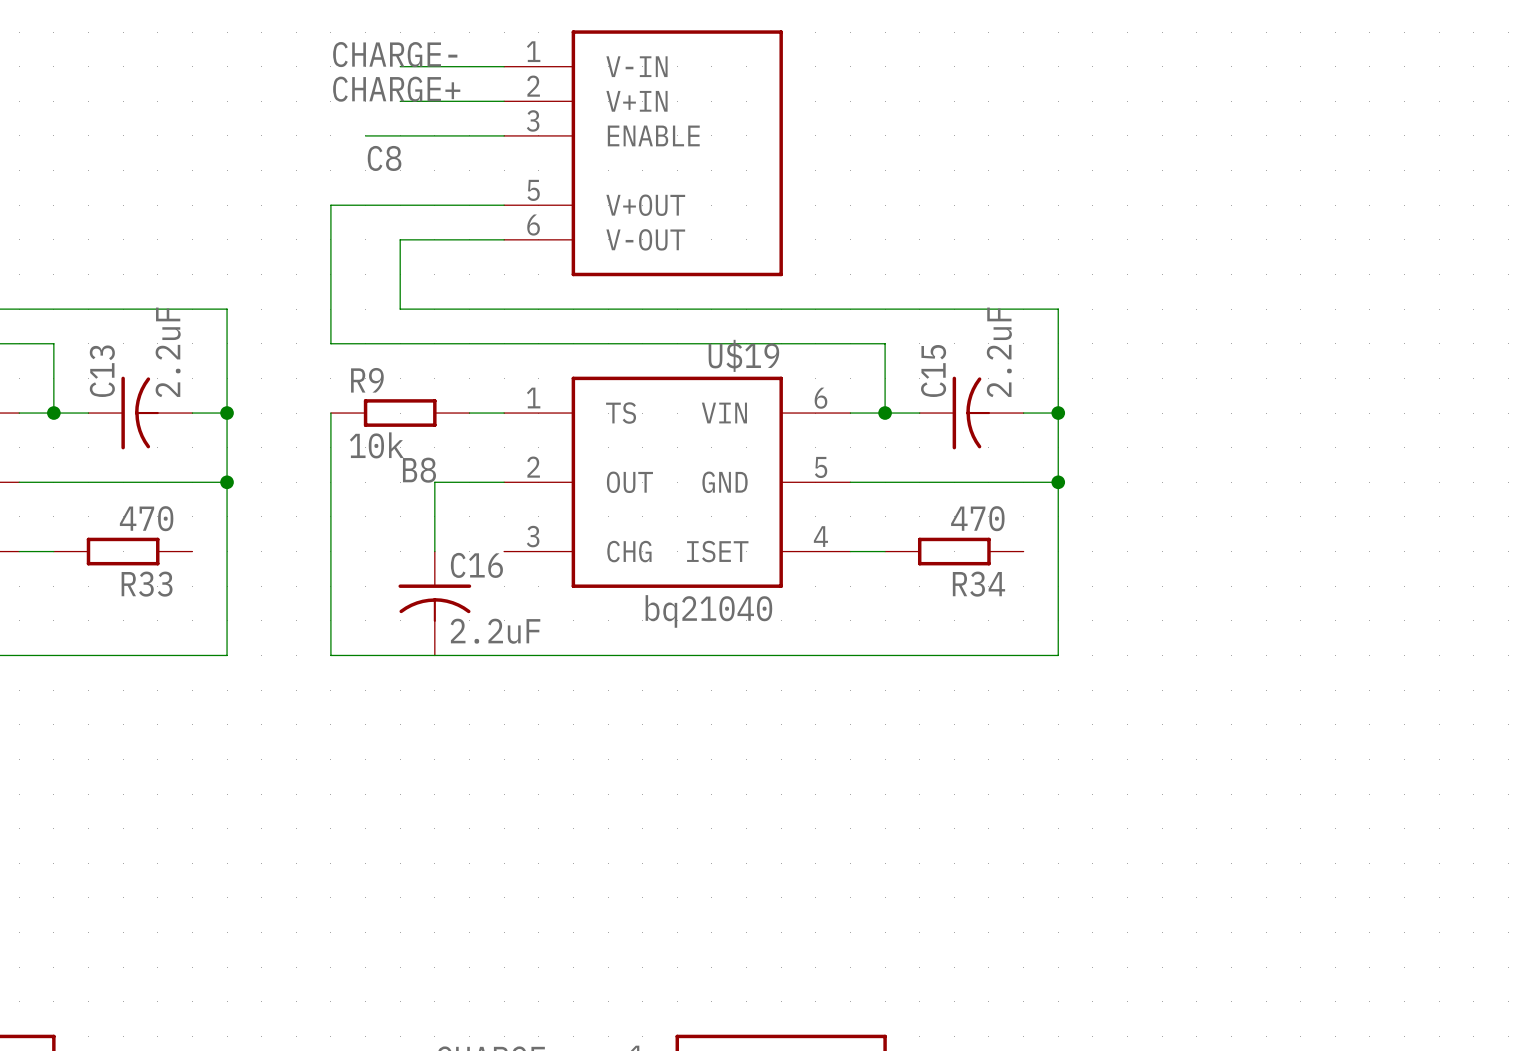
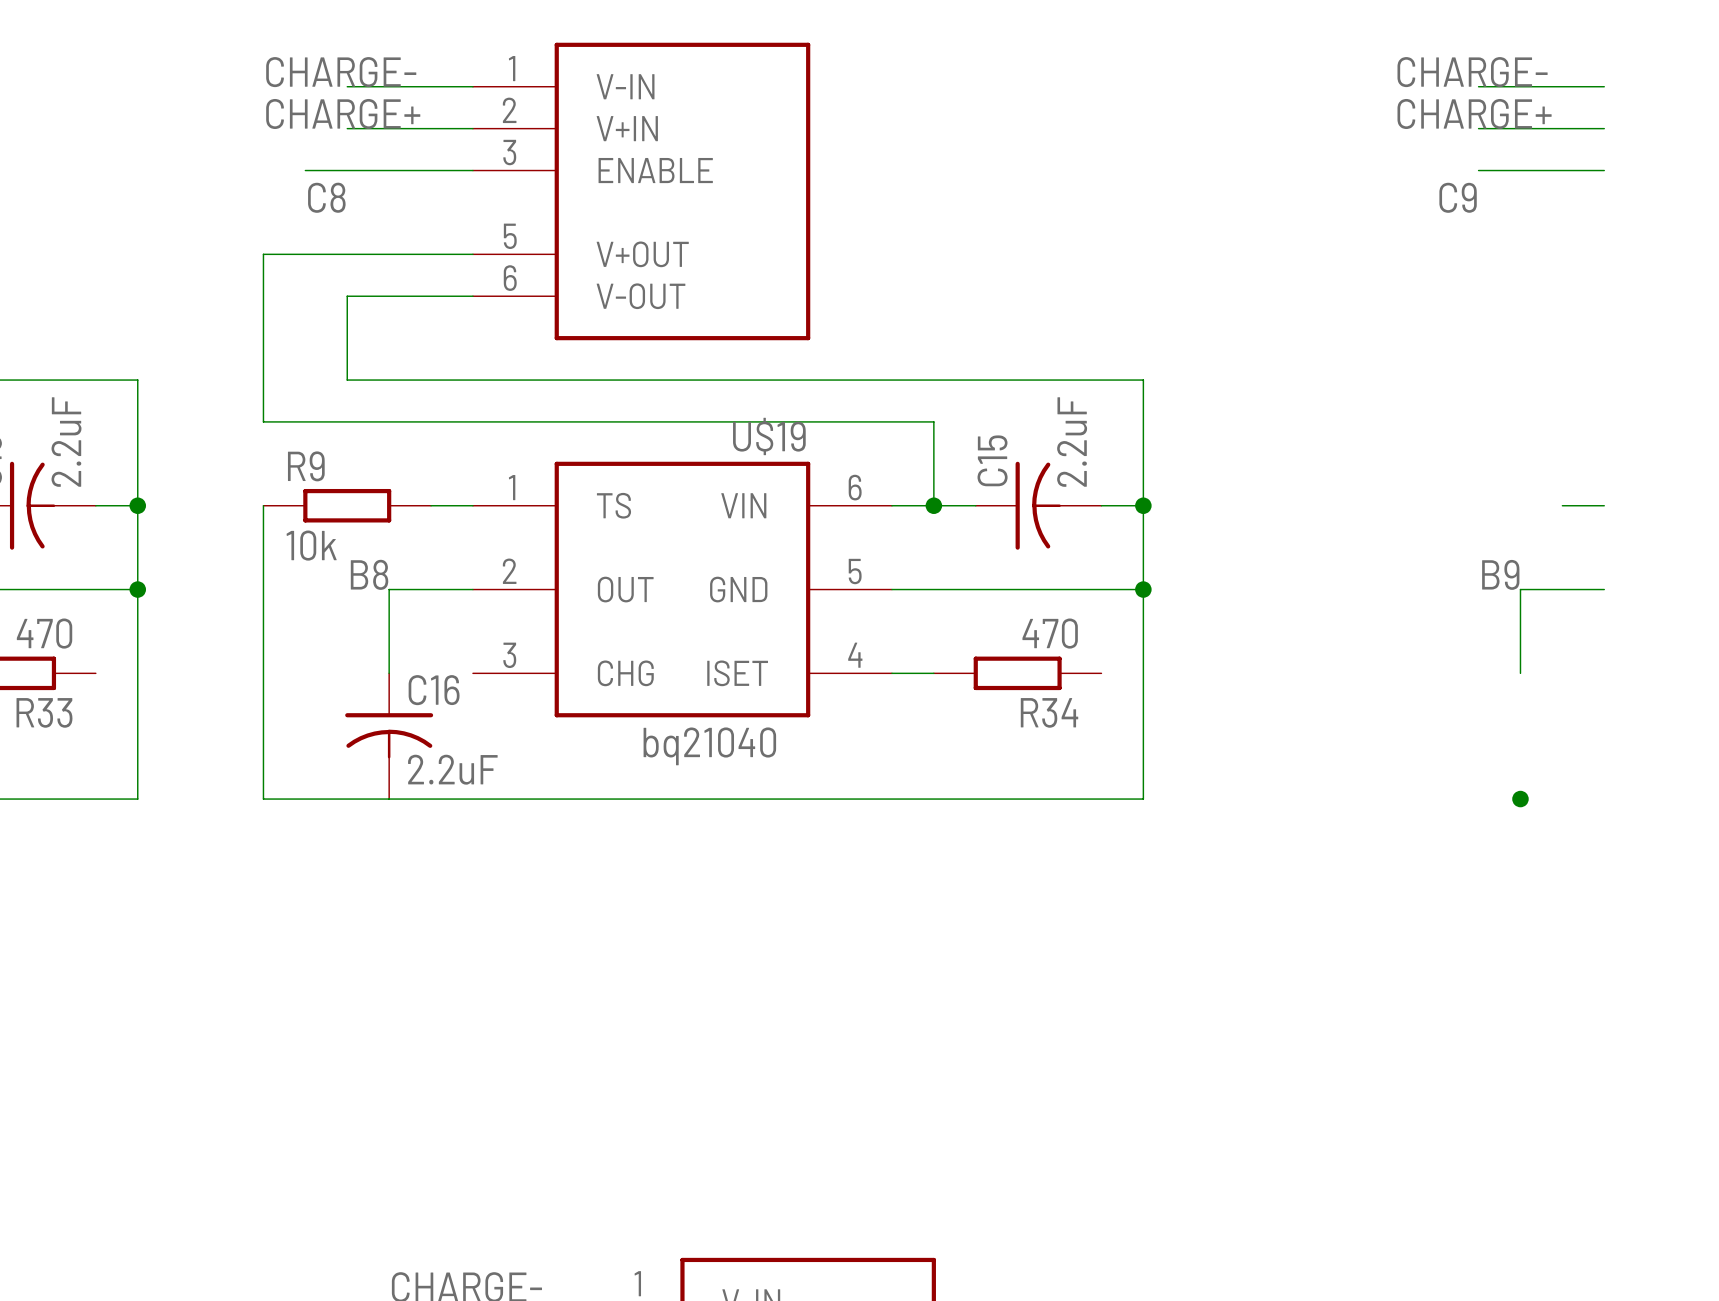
label: none -> CHARGE- (1472, 72)
wire: none -> (1478, 86) (1604, 86)
label: none -> CHARGE+ (1474, 113)
wire: none -> (1478, 128) (1604, 128)
wire: none -> (1478, 170) (1604, 170)
label: none -> C9 (1458, 197)
wire: none -> (1562, 505) (1604, 505)
label: none -> B9 (1500, 574)
wire: none -> (1604, 589) (1520, 589) (1520, 673)
junction: none -> (1520, 799)

